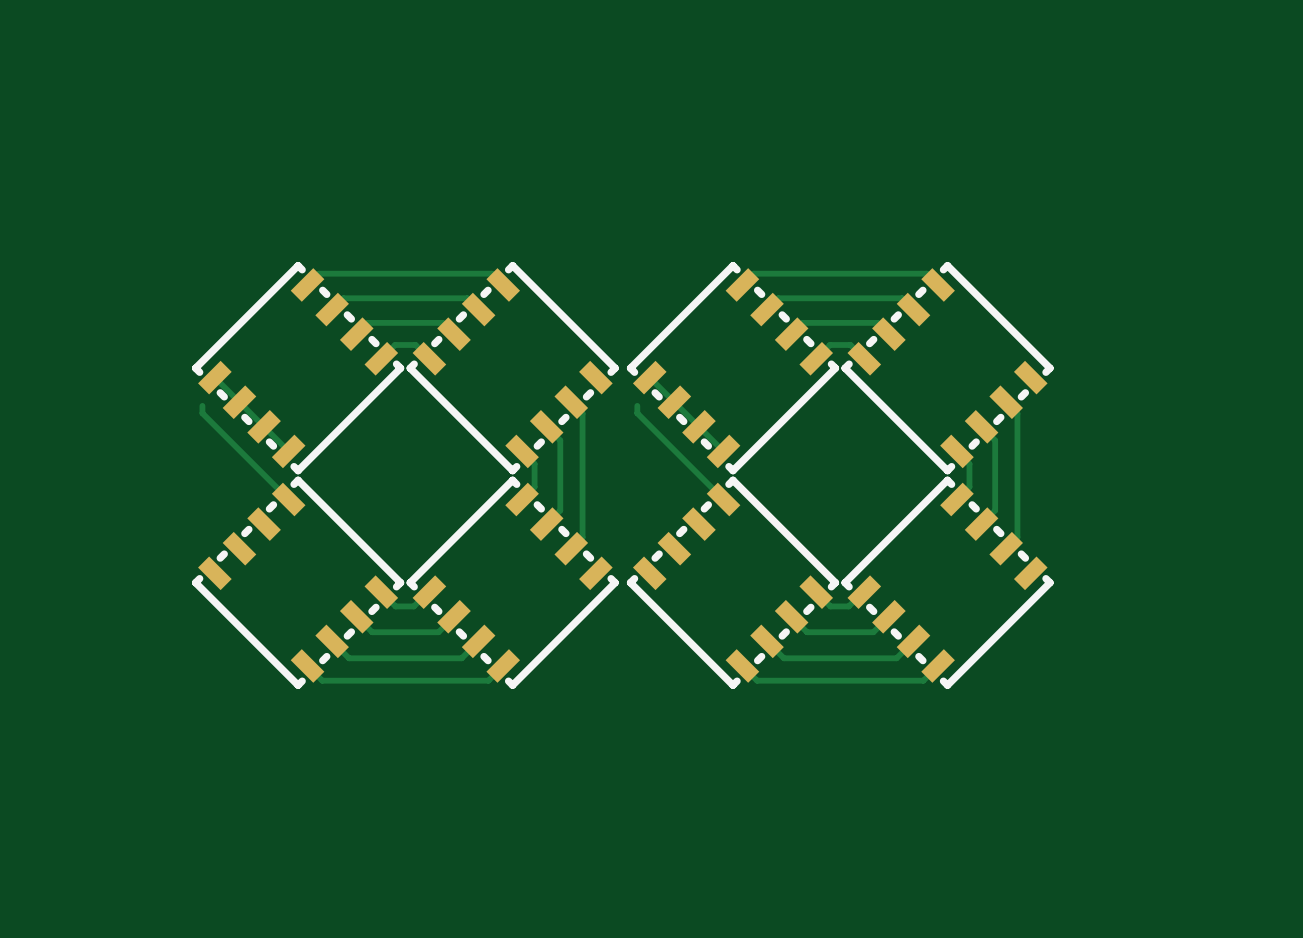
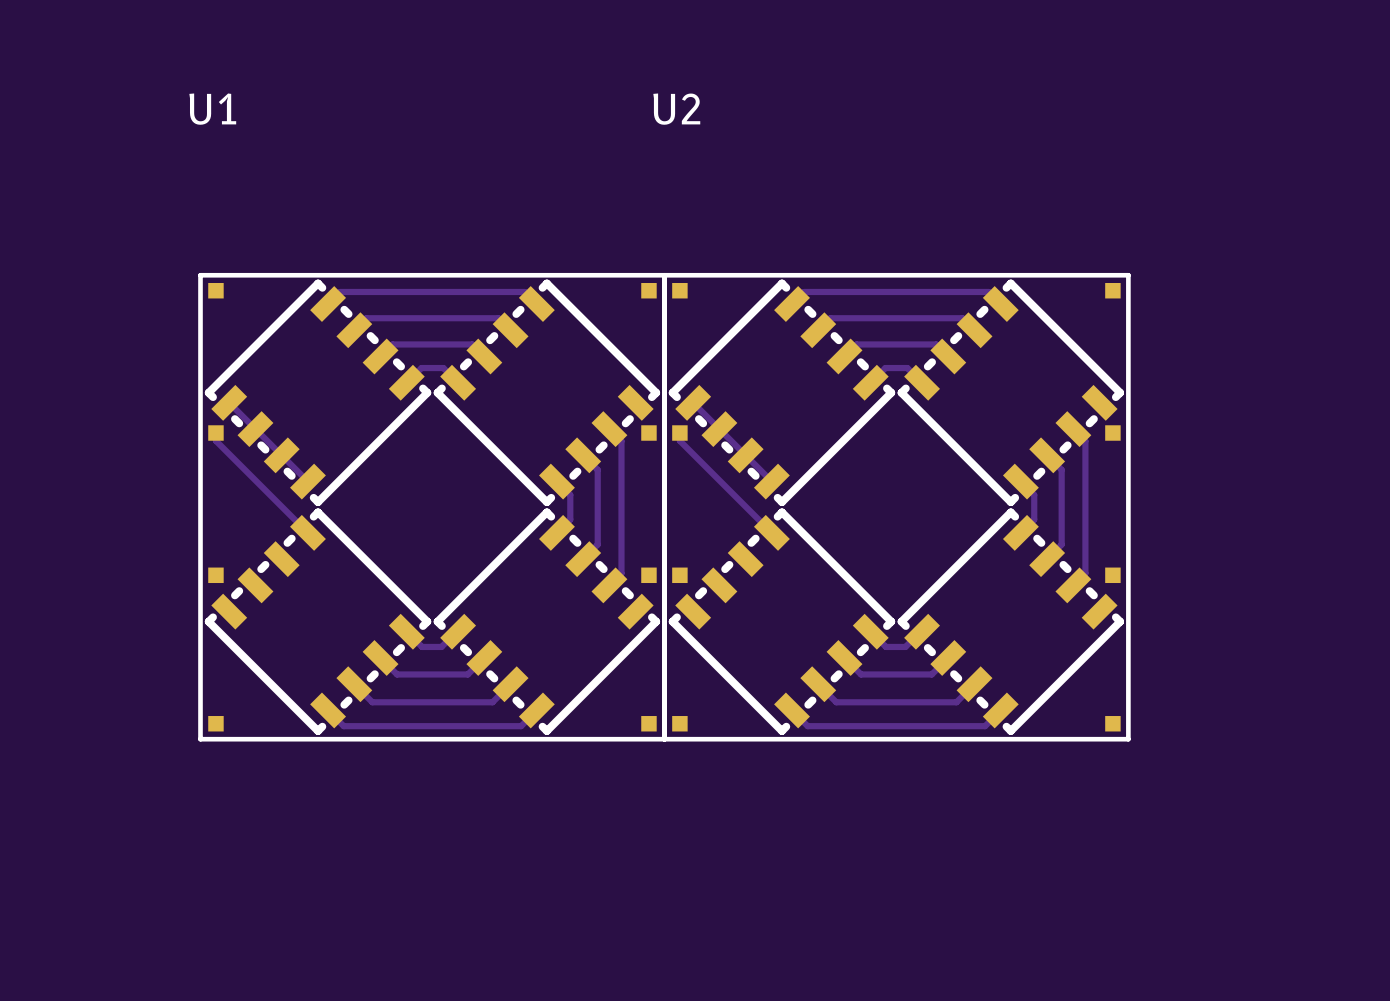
U1: none -> (432, 507)
U2: none -> (896, 507)

